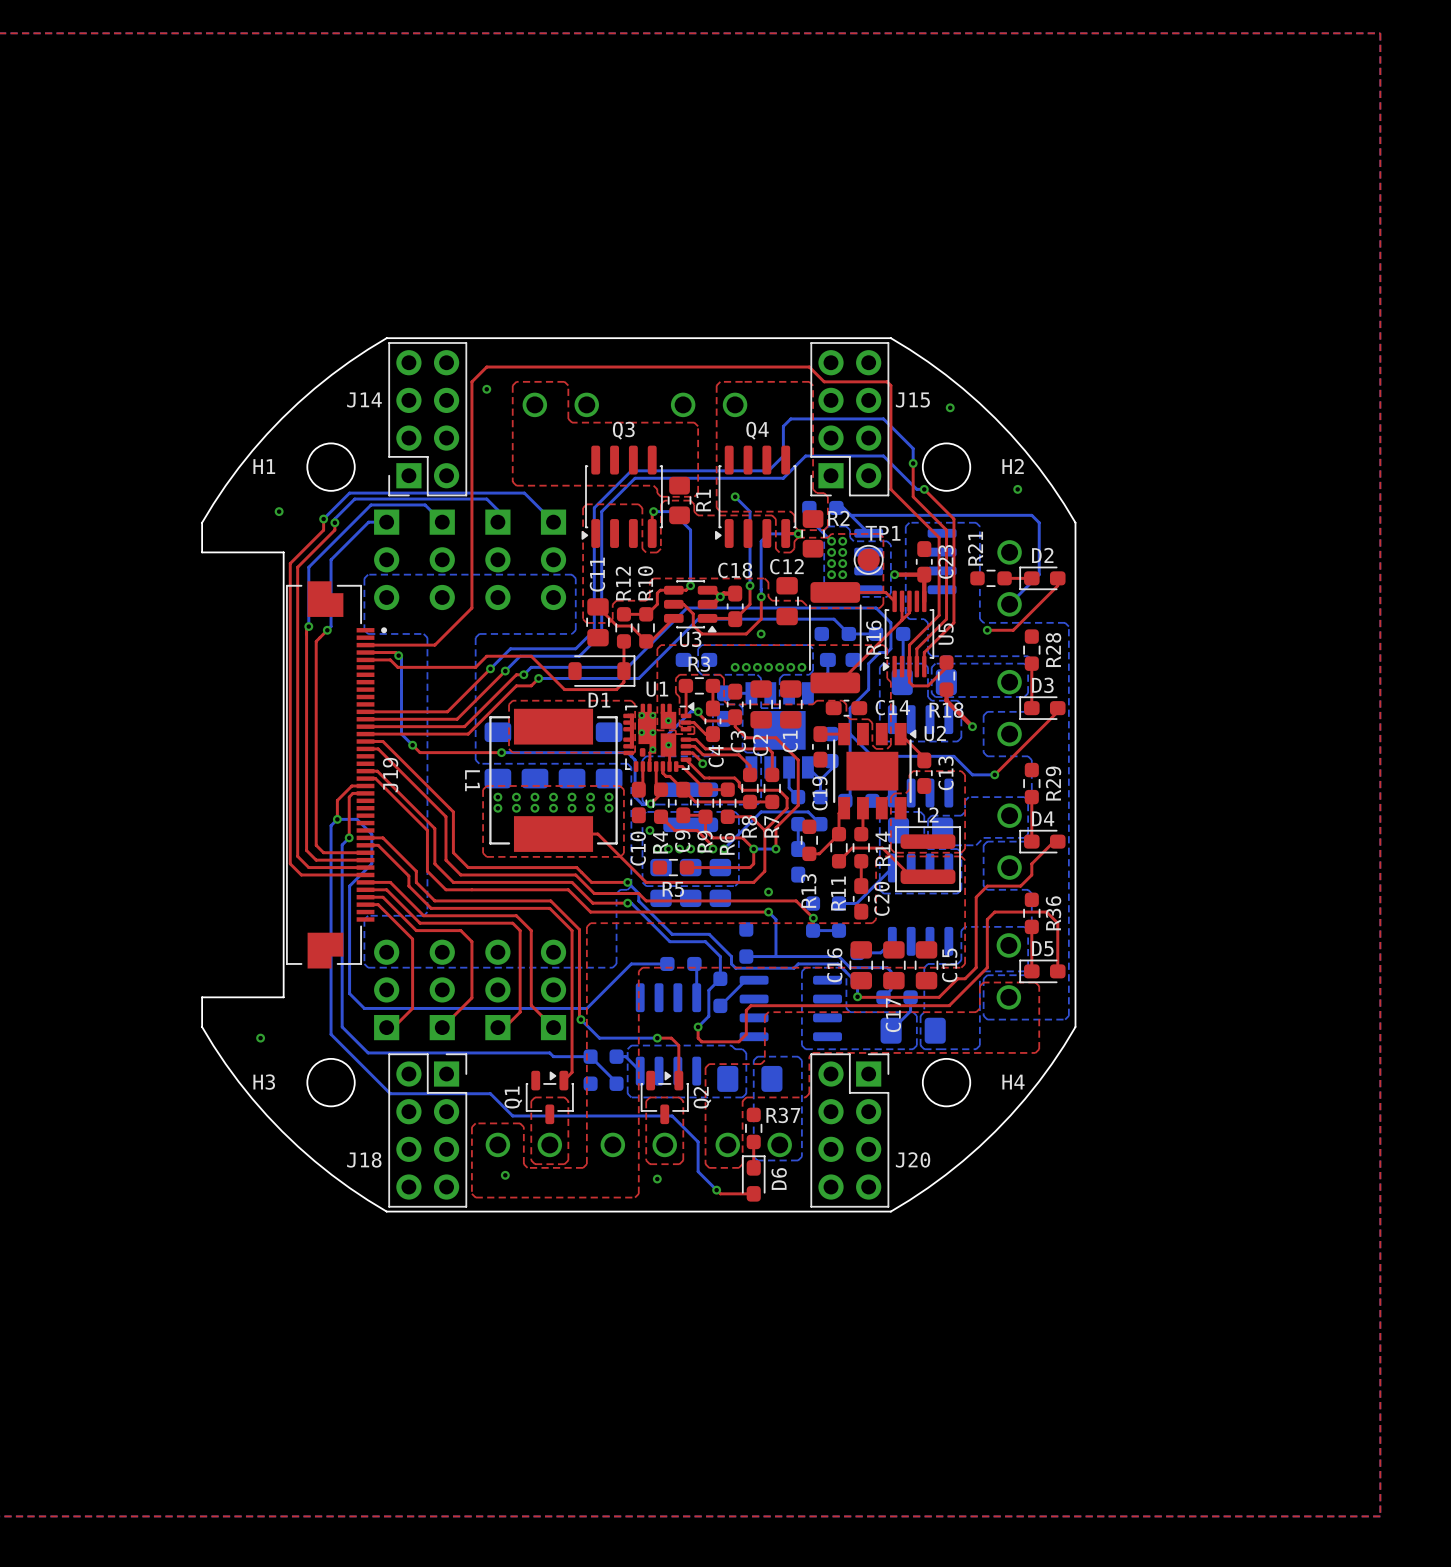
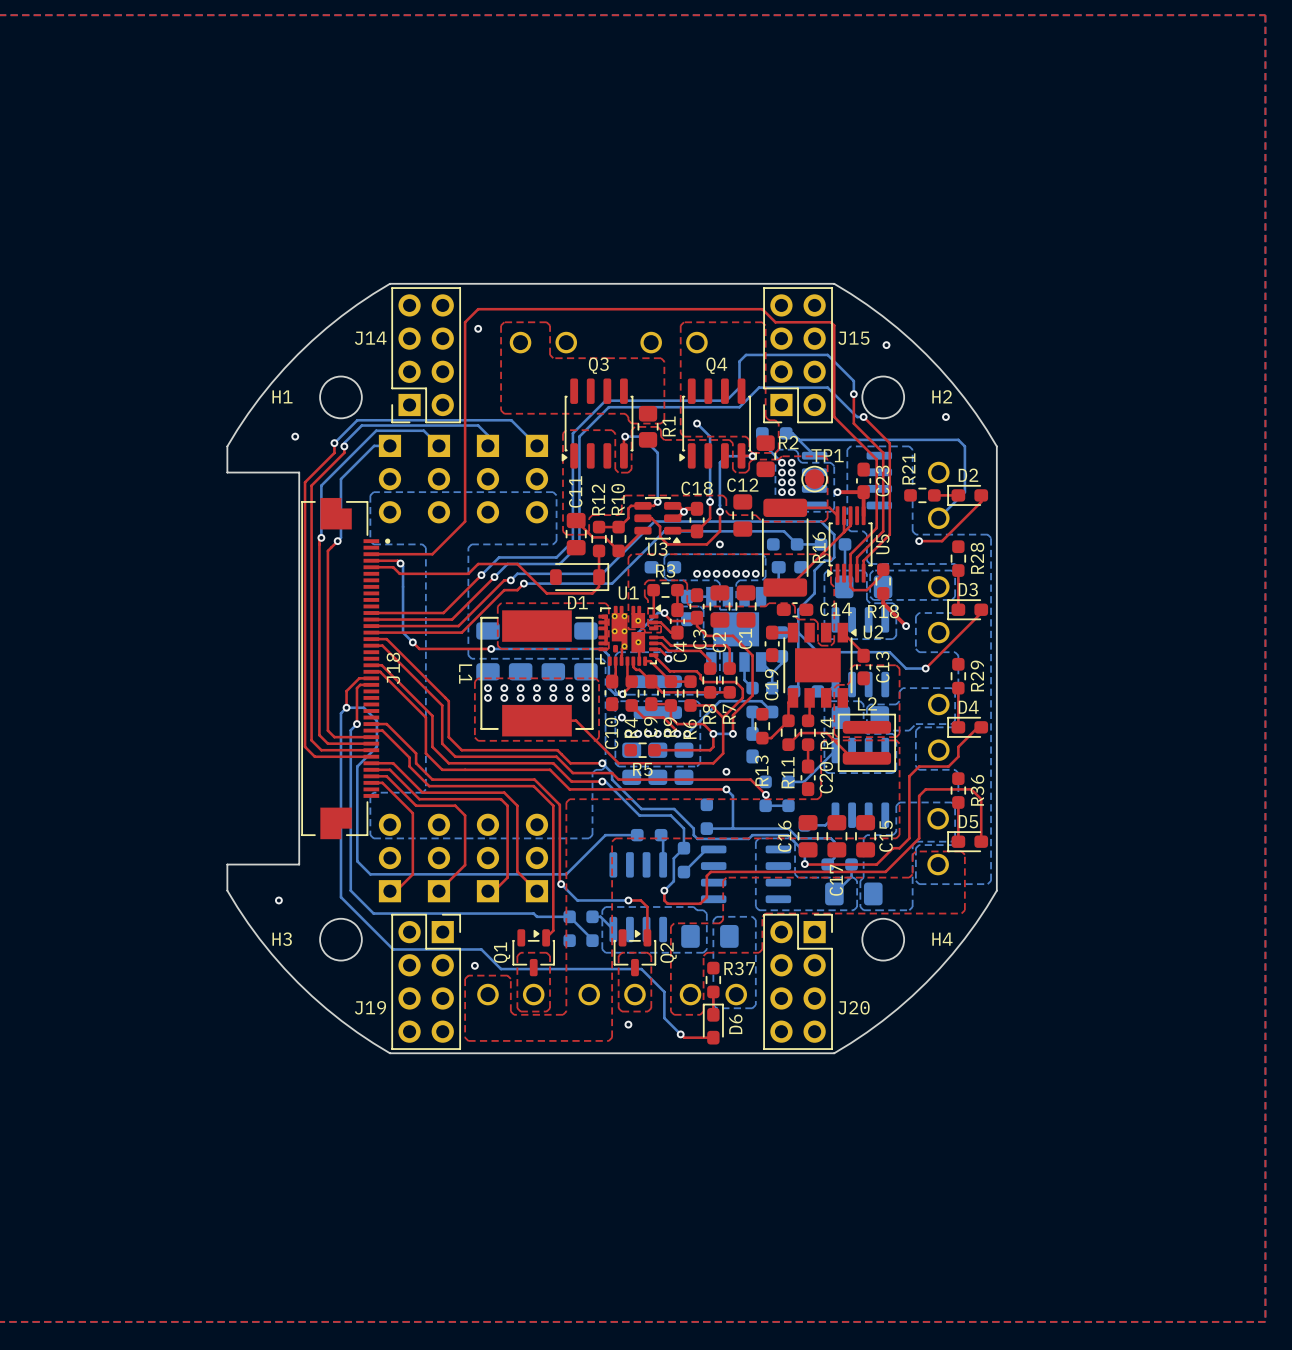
J19 name: J19 (390, 775) -> J18 (393, 668)
J18 name: J18 (364, 1159) -> J19 (370, 1007)
via position: (505, 1175) -> (474, 965)

